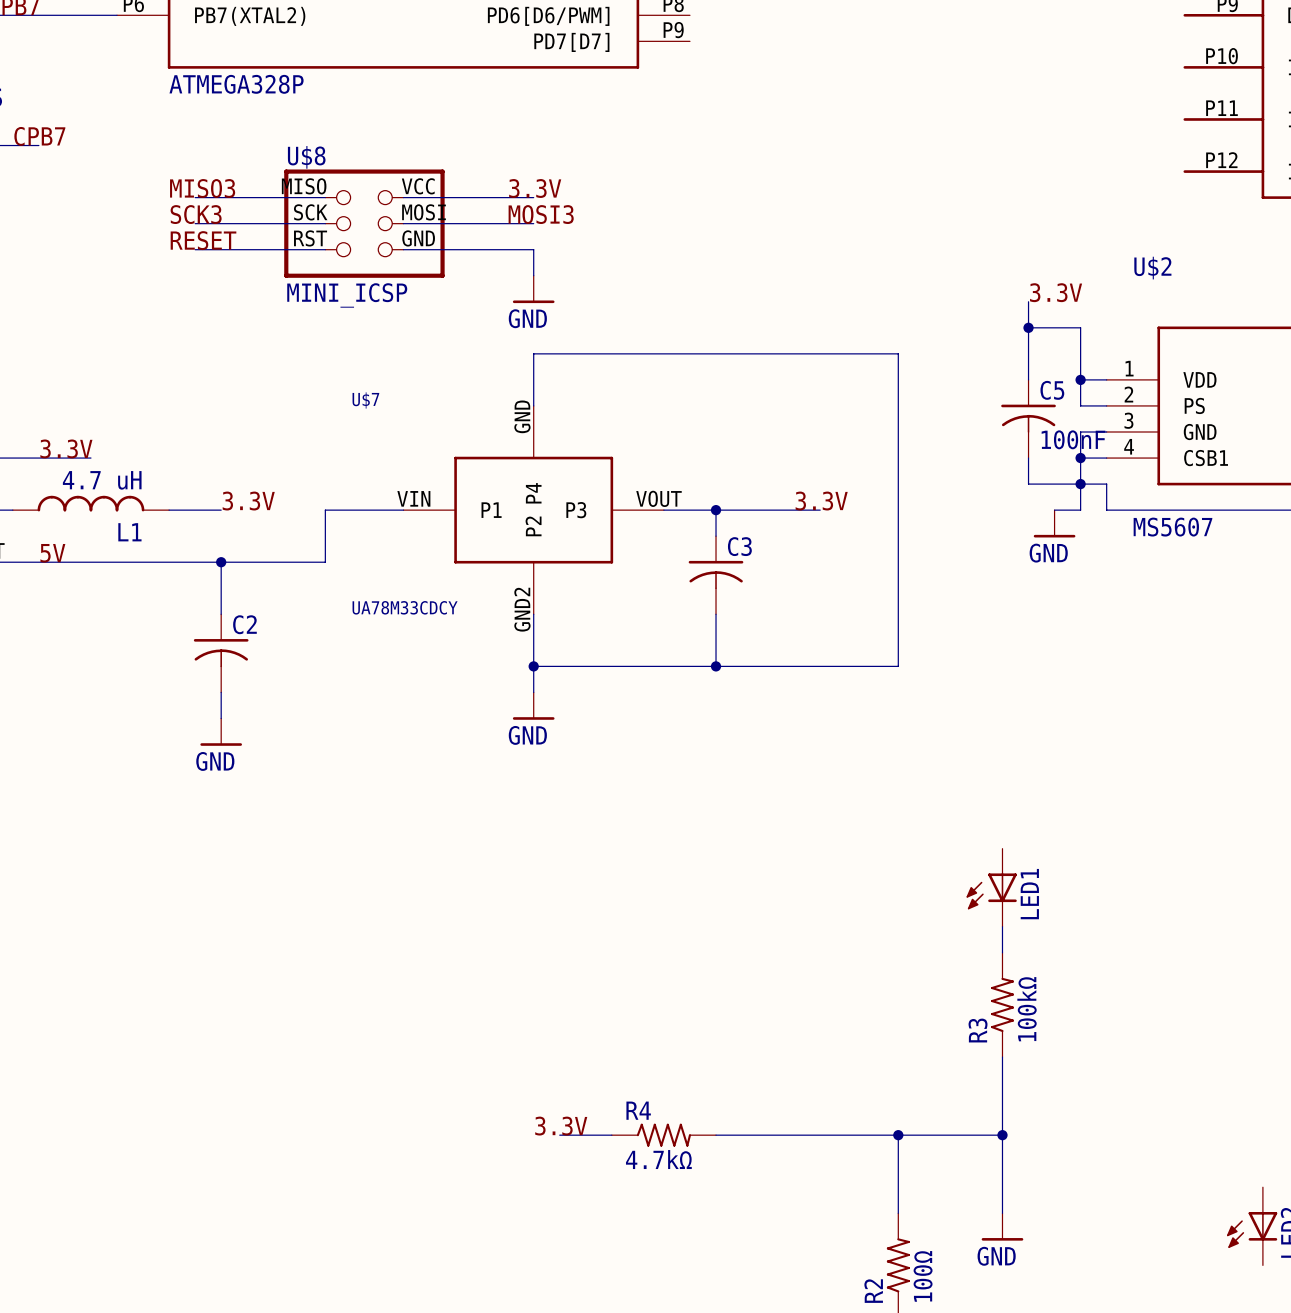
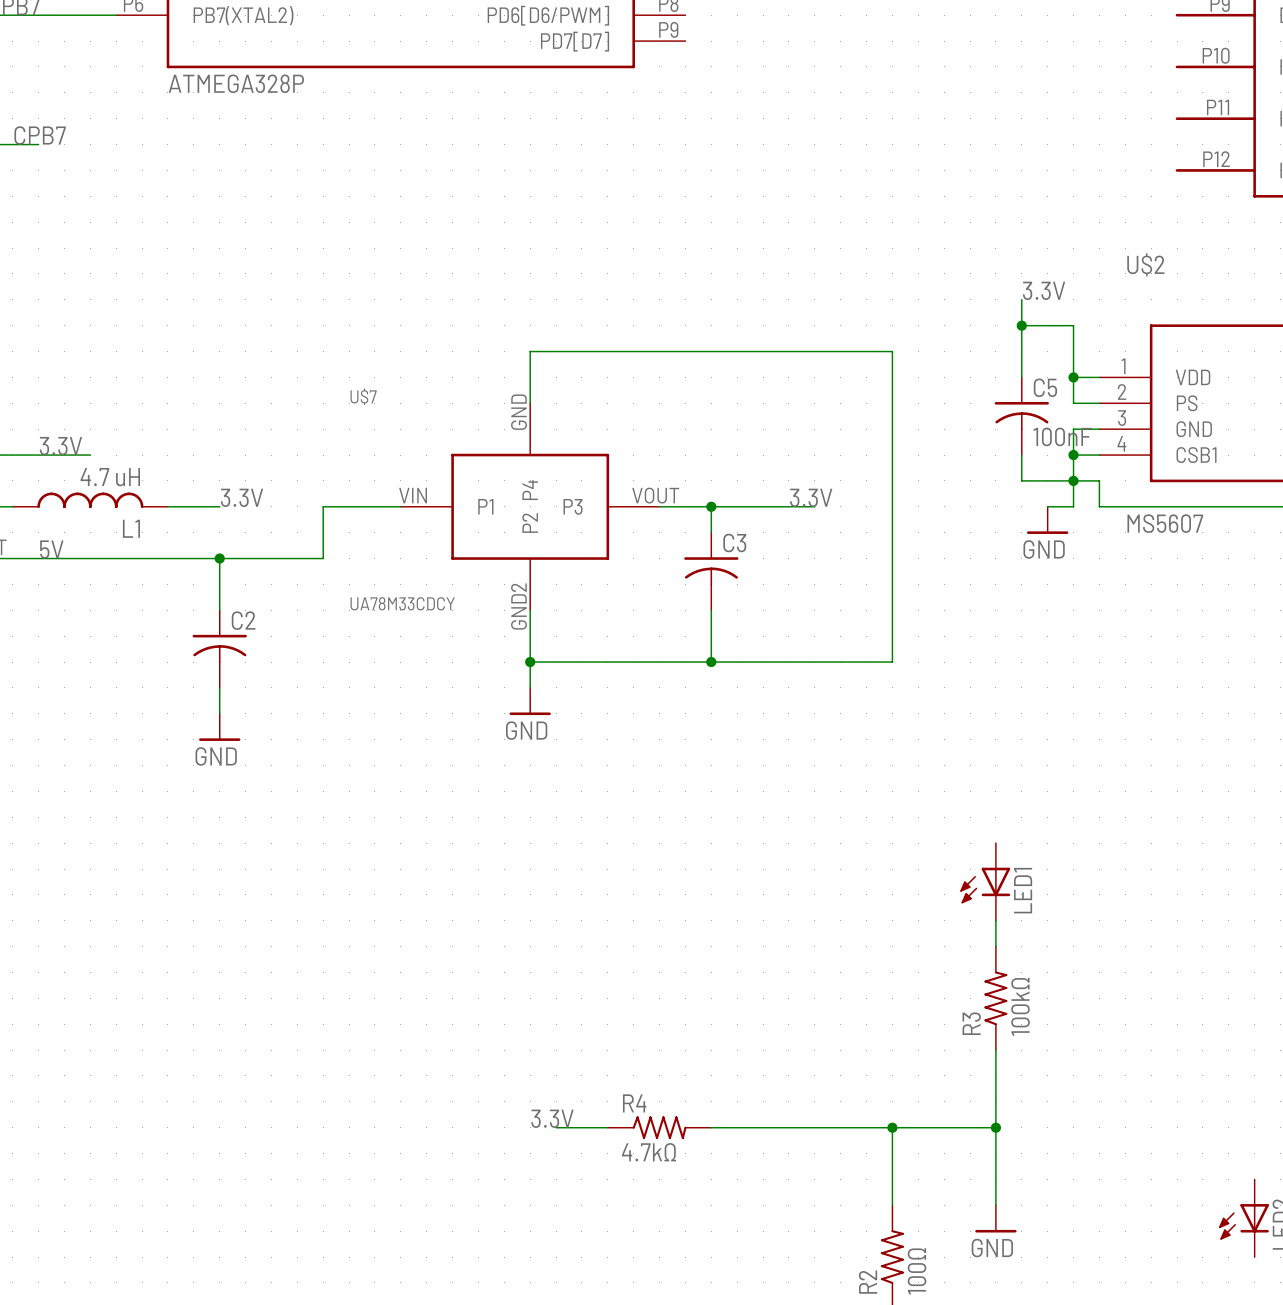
label: MISO3 (202, 188) -> none
label: 3.3V (535, 188) -> none
wire: (195, 197) (325, 197) -> none
wire: (403, 197) (533, 197) -> none
label: SCK3 (196, 214) -> none
label: MOSI3 (541, 214) -> none
wire: (195, 223) (325, 223) -> none
U$8: MINI_ICSP (364, 223) -> none
wire: (403, 223) (533, 223) -> none
label: RESET (203, 240) -> none
wire: (195, 249) (325, 249) -> none
wire: (403, 249) (533, 249) (533, 275) -> none
power symbol: GND (533, 289) -> none

